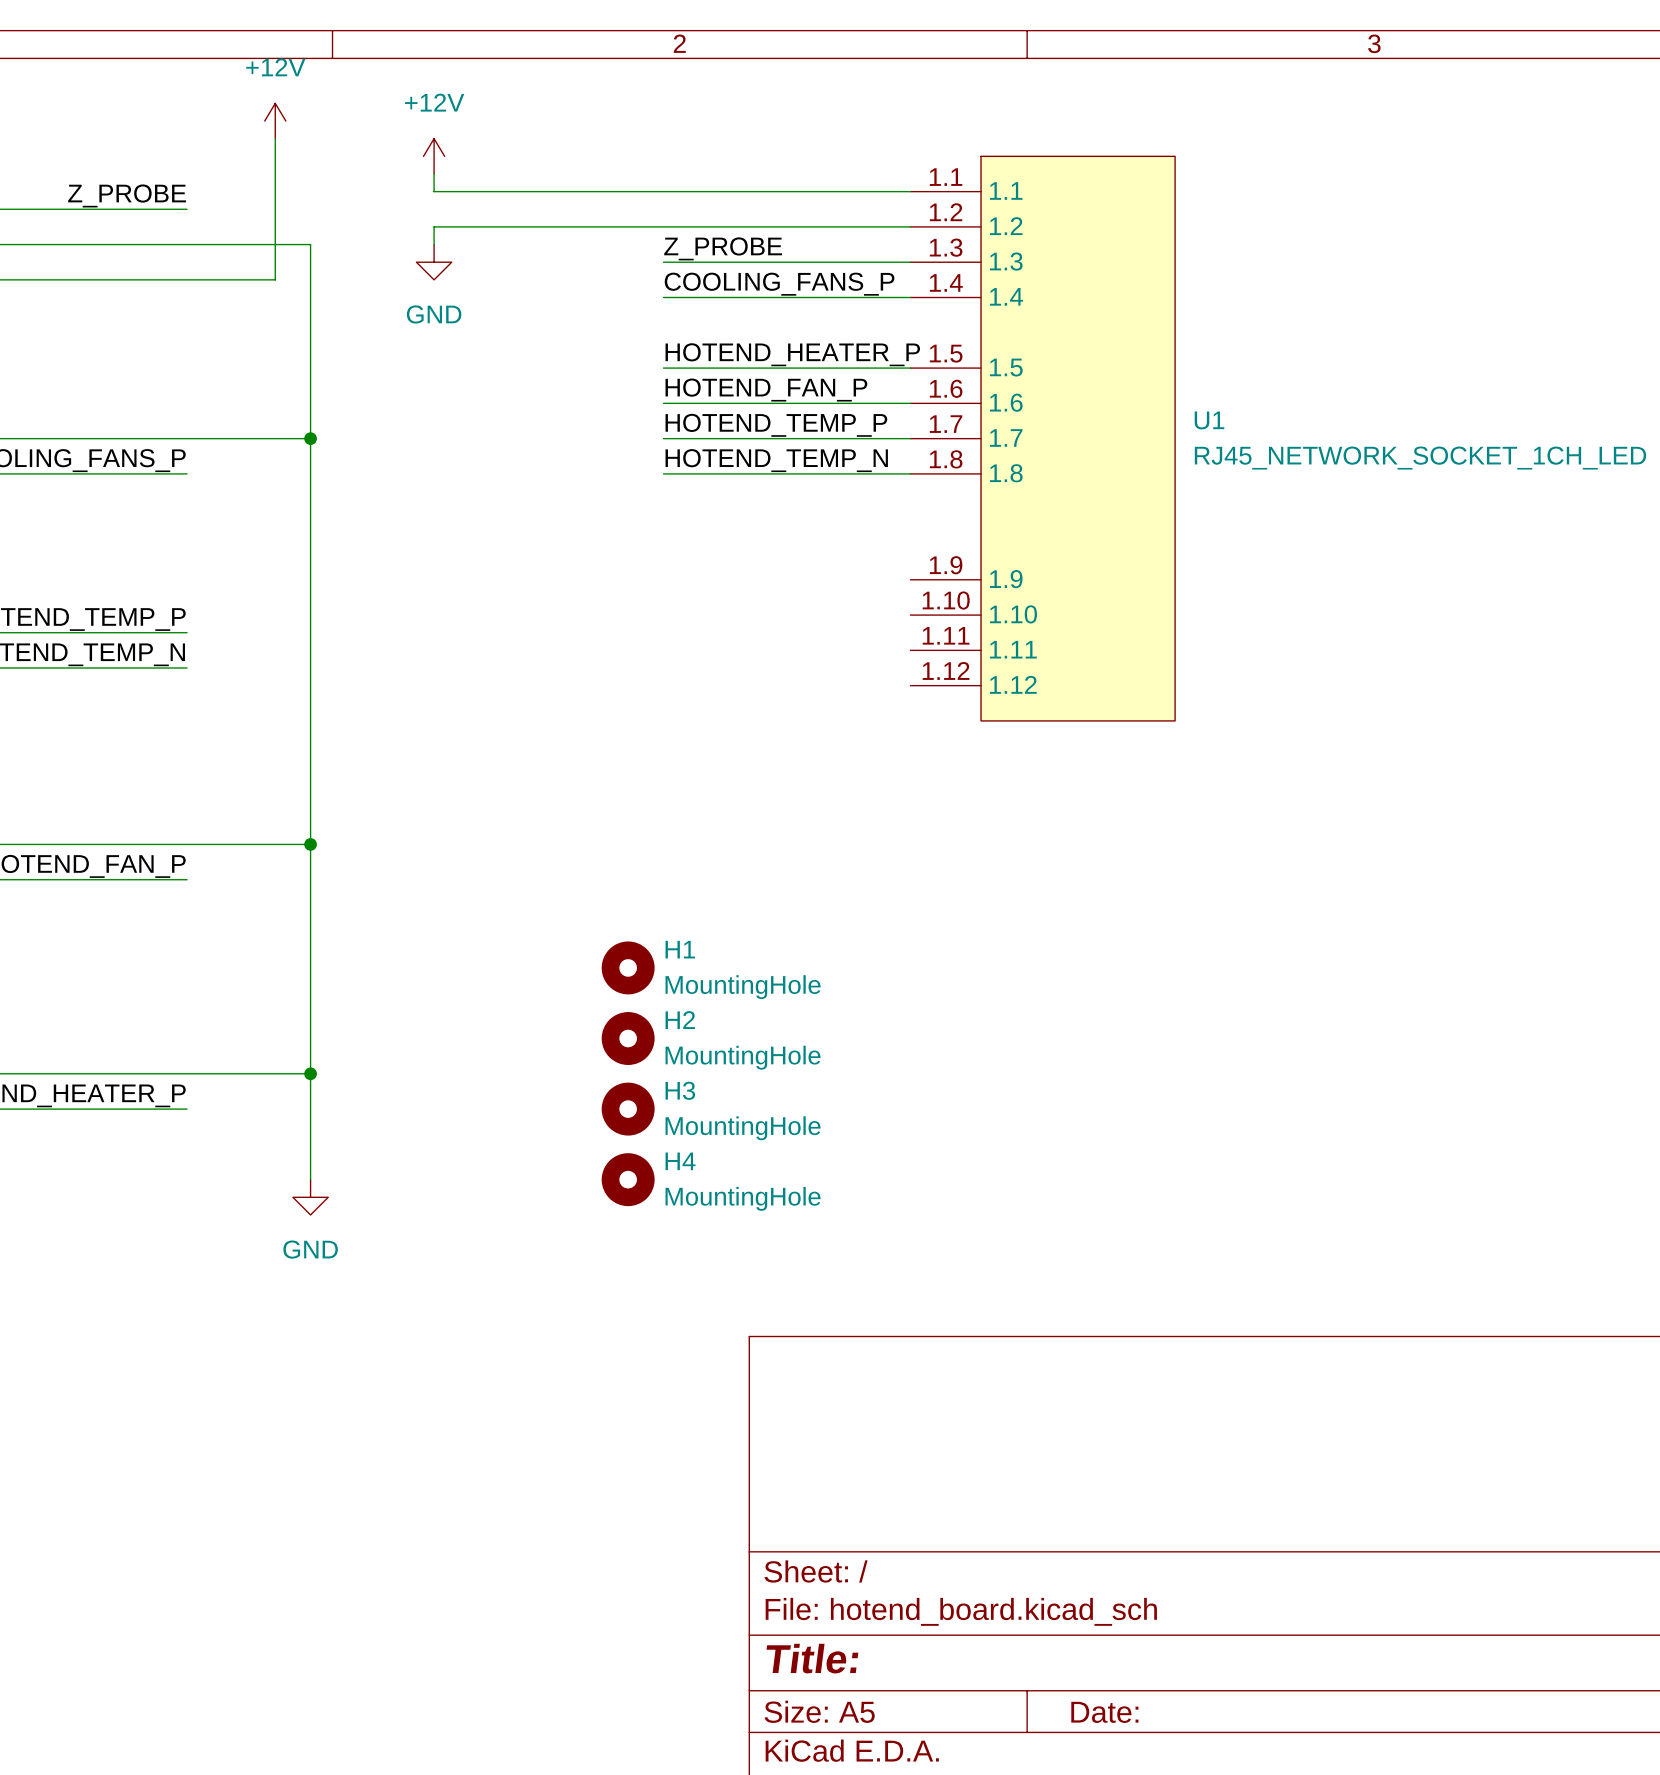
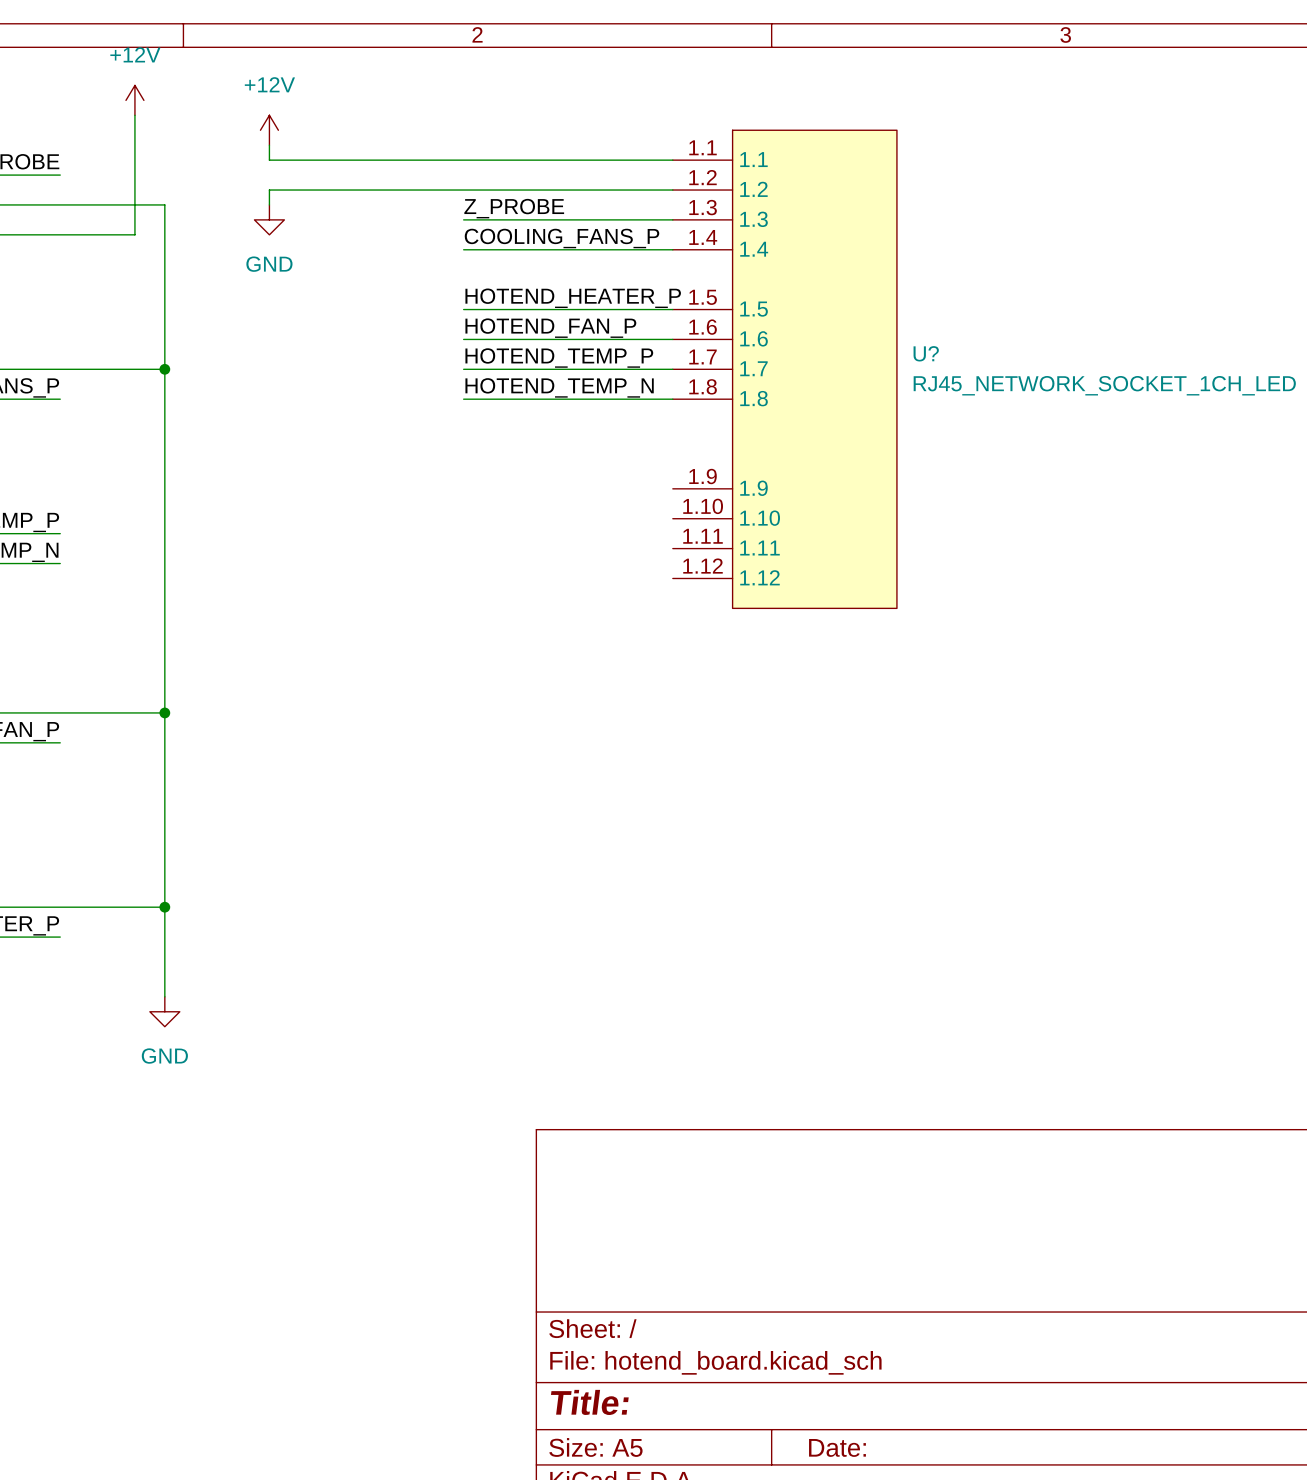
U1 name: U1 (1209, 420) -> U? (926, 353)
H1: MountingHole (628, 967) -> none
H2: MountingHole (628, 1038) -> none
H3: MountingHole (628, 1109) -> none
H4: MountingHole (628, 1179) -> none

